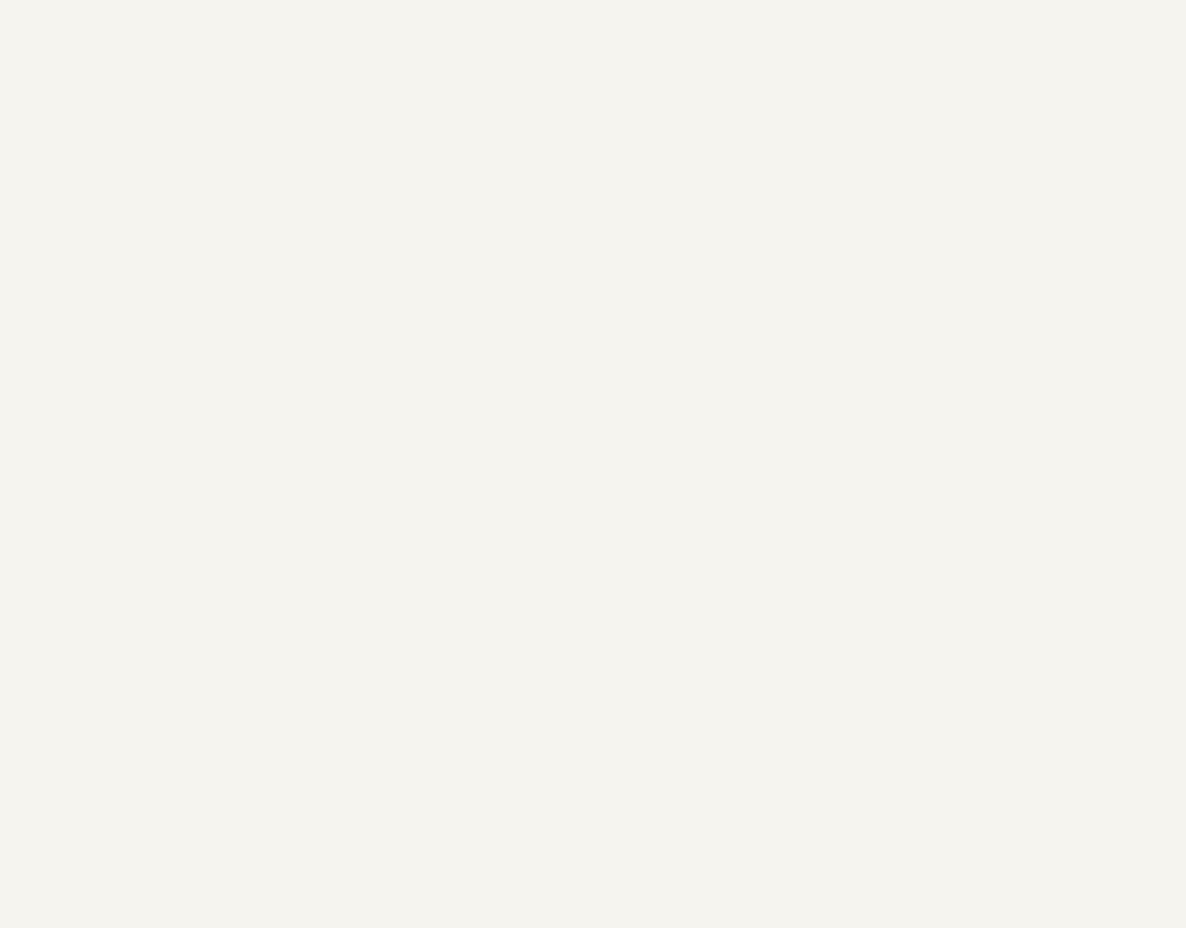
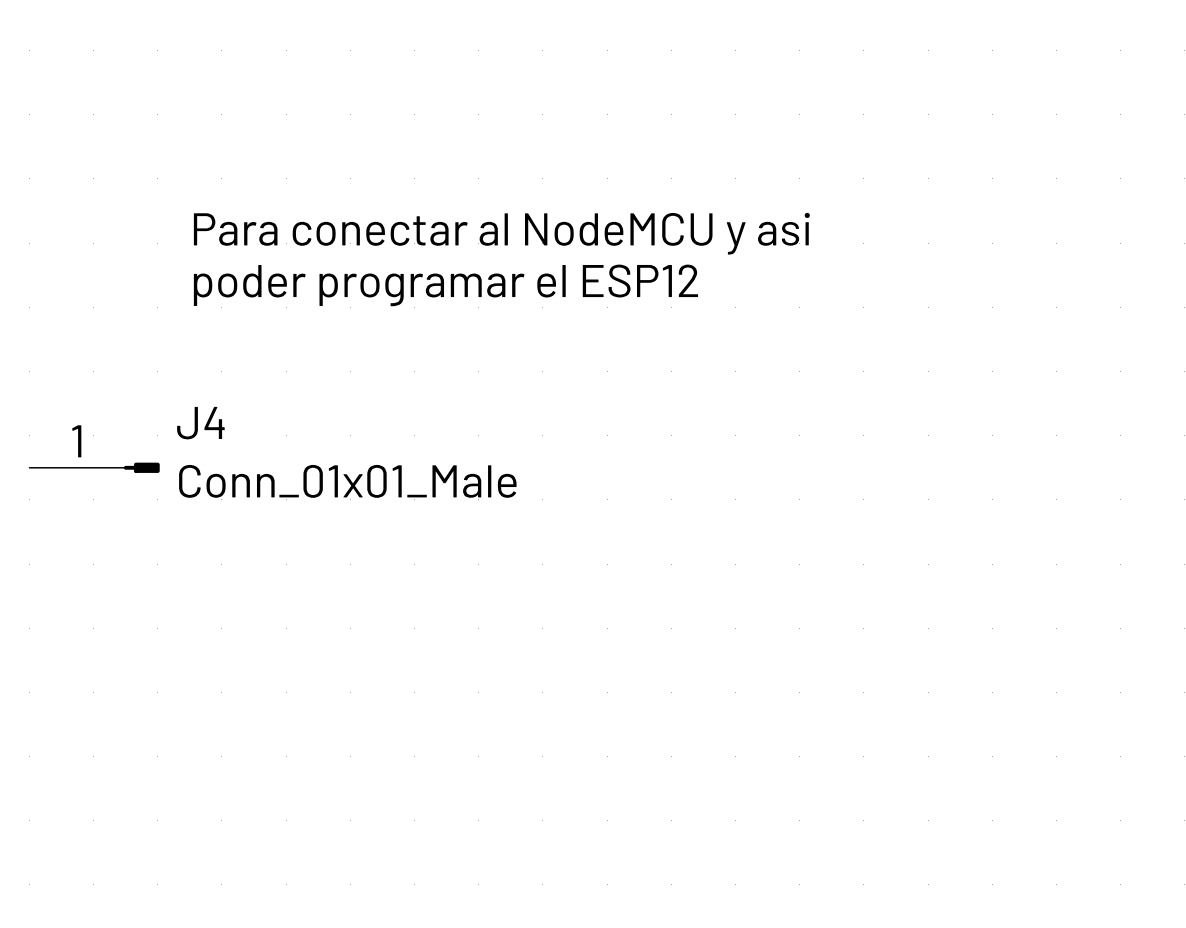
text: none -> Para conectar al NodeMCU y asi (501, 233)
text: none -> poder programar el ESP12 (446, 285)
J4: none -> Conn_01x01_Male (94, 467)

